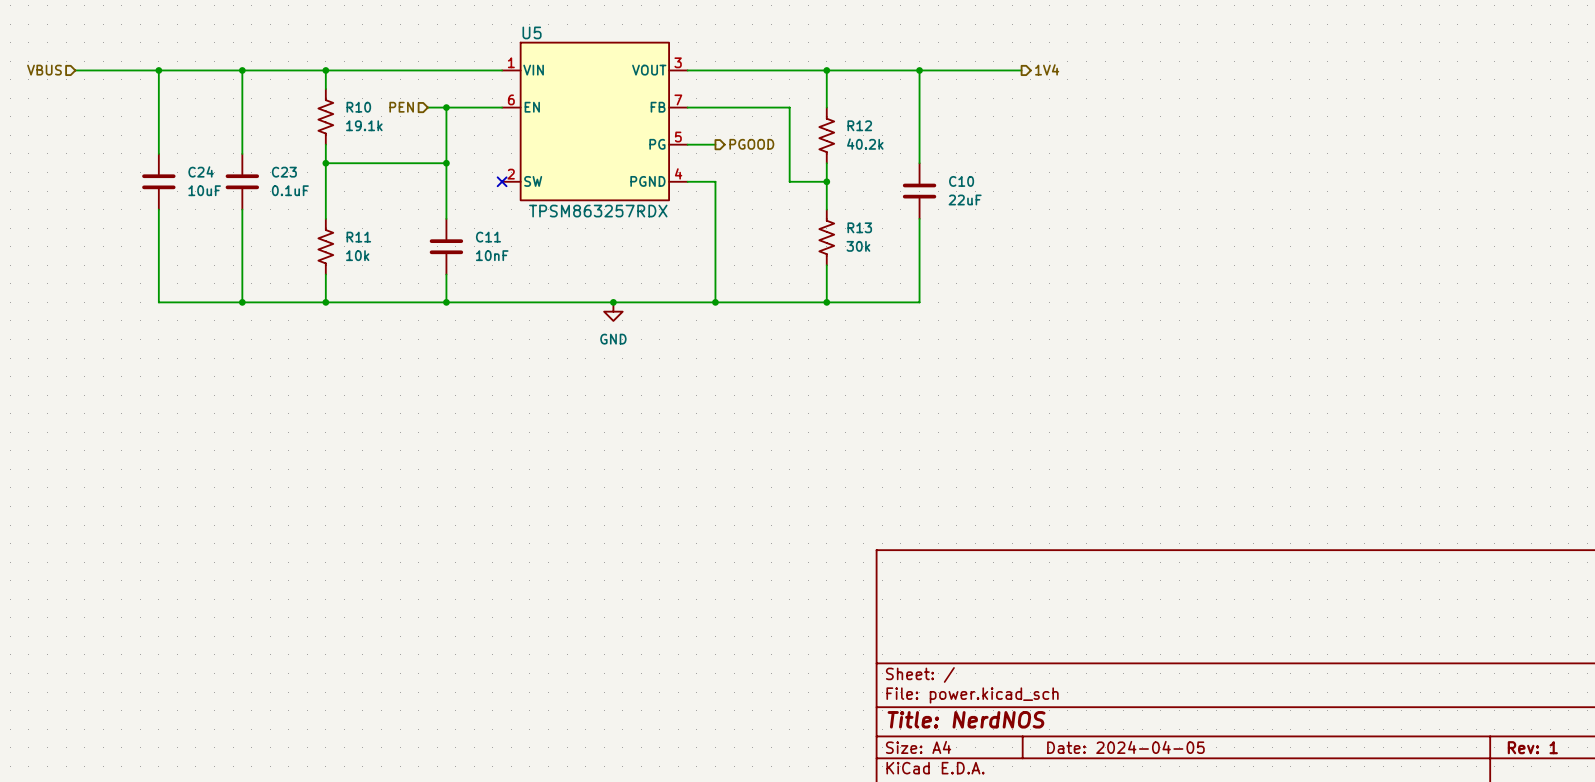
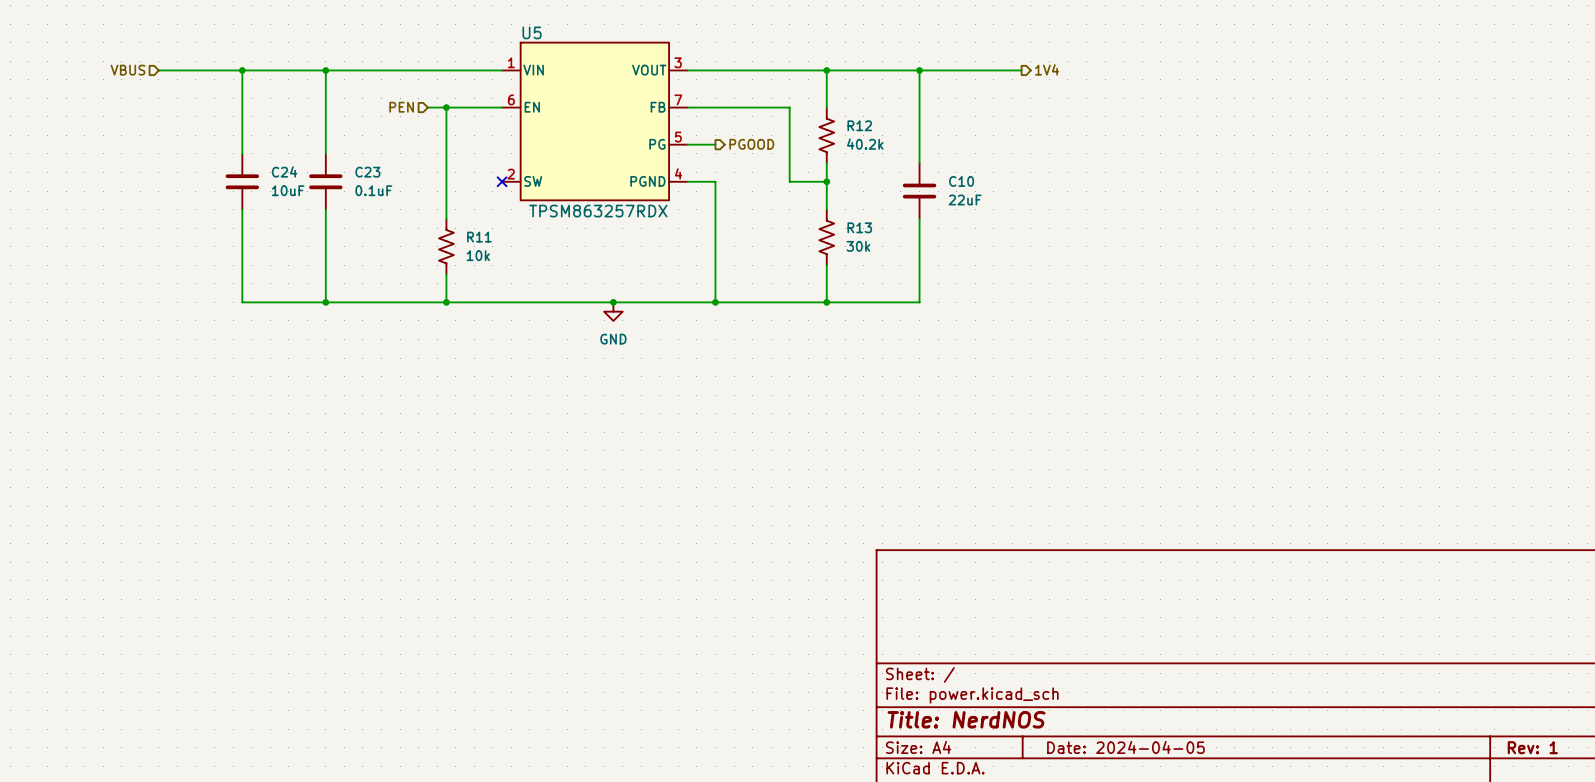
hierarchical label position: VBUS (44, 70) -> VBUS (128, 70)
wire: (75, 70) (158, 70) (158, 153) -> none
junction: (158, 70) -> none
R10: 19.1k (325, 116) -> none
wire: (325, 163) (446, 163) -> none
junction: (325, 163) -> none
junction: (446, 163) -> none
C23 name: C23 (284, 172) -> C24 (284, 171)
C24: 10uF (158, 181) -> none
C23: none -> 0.1uF (325, 181)
C23 value: 0.1uF (290, 190) -> 10uF (288, 190)
wire: (158, 209) (158, 302) (242, 302) -> none
R11 position: (325, 246) -> (446, 246)
C11: 10nF (446, 246) -> none
junction: (242, 302) -> none

